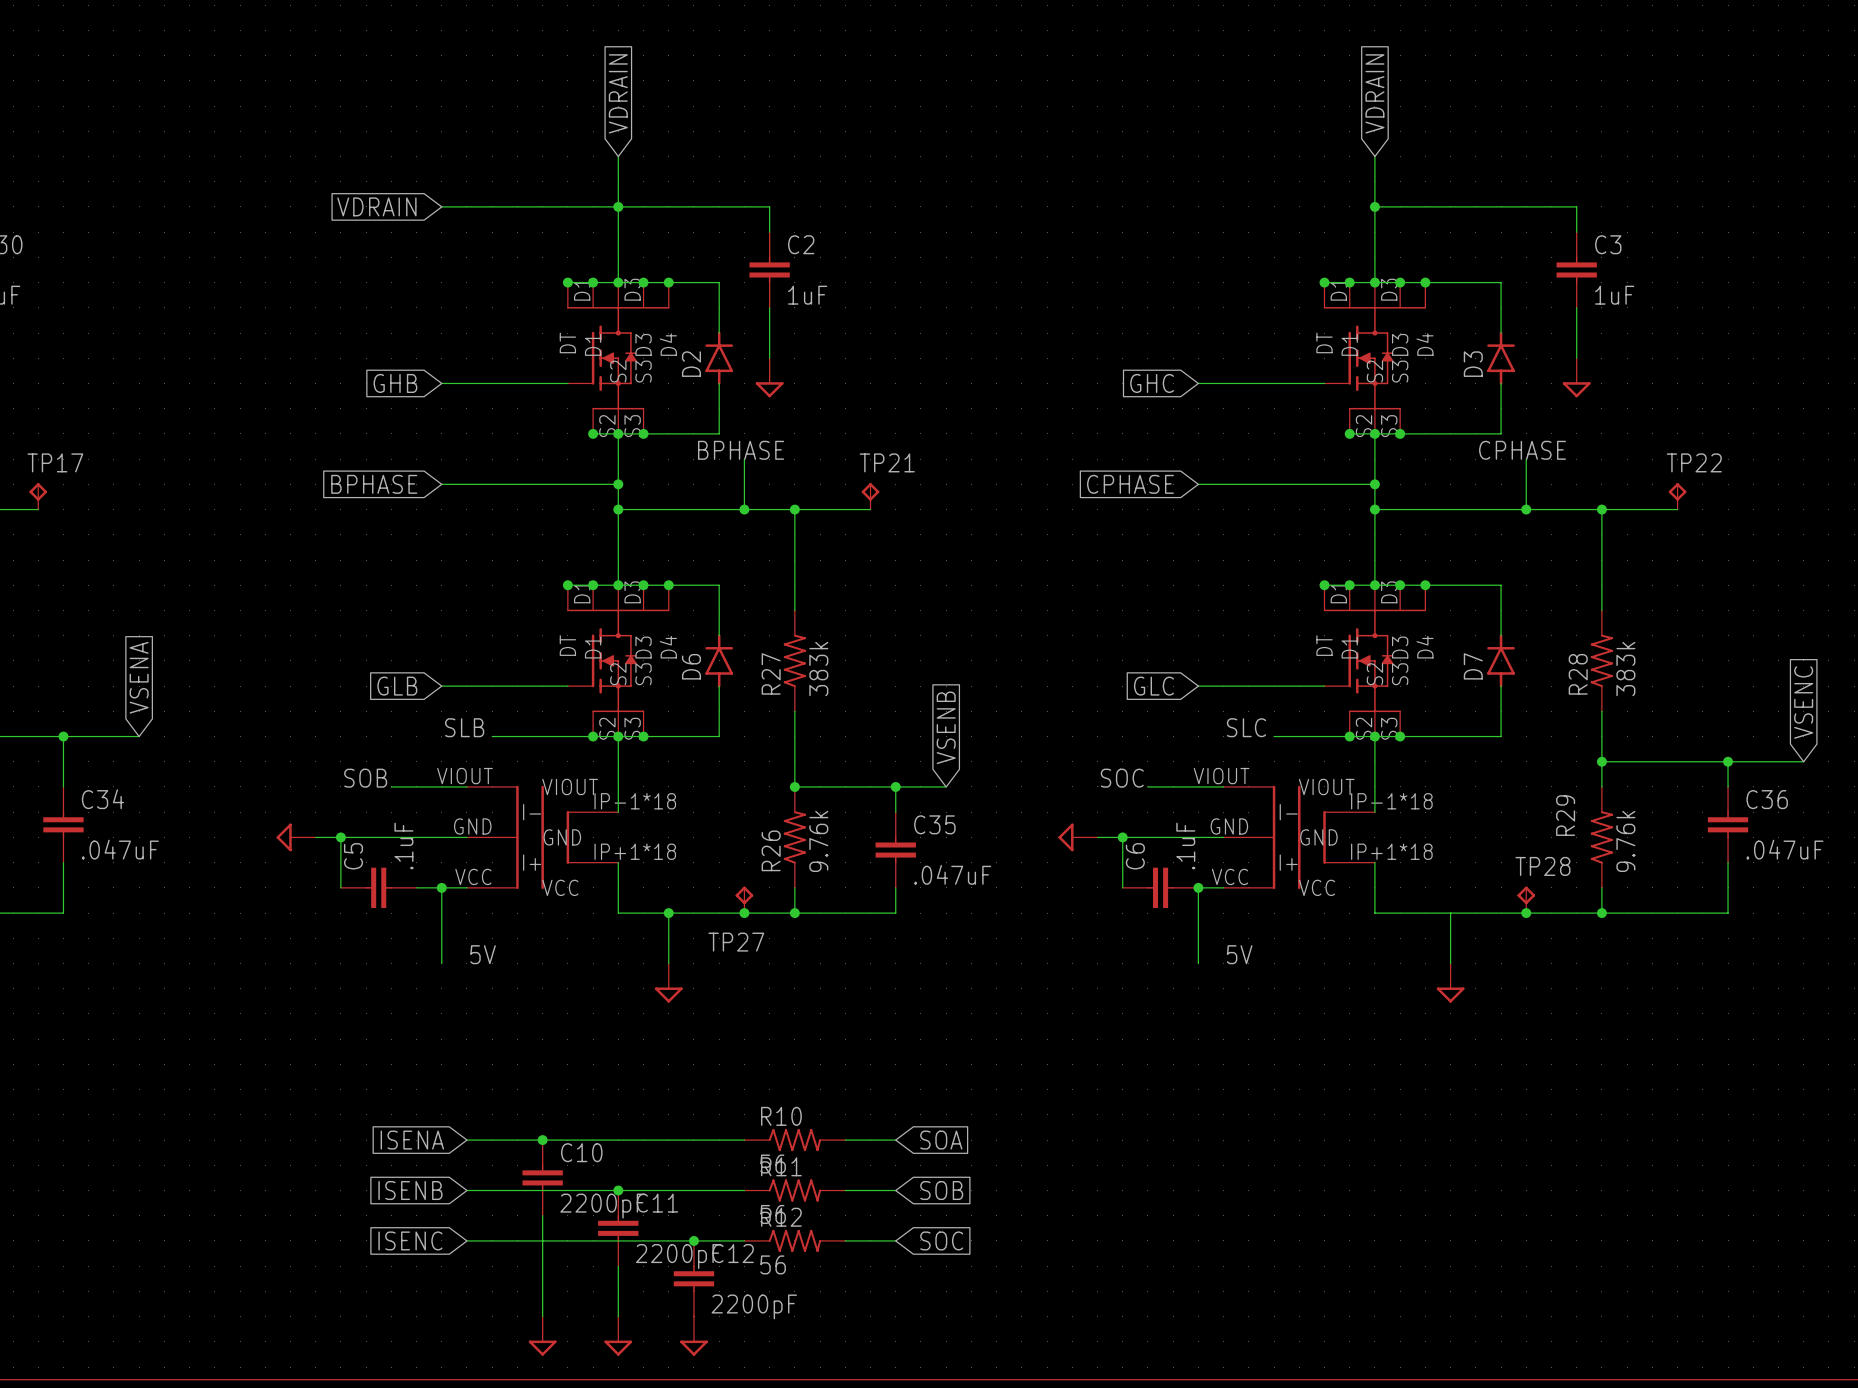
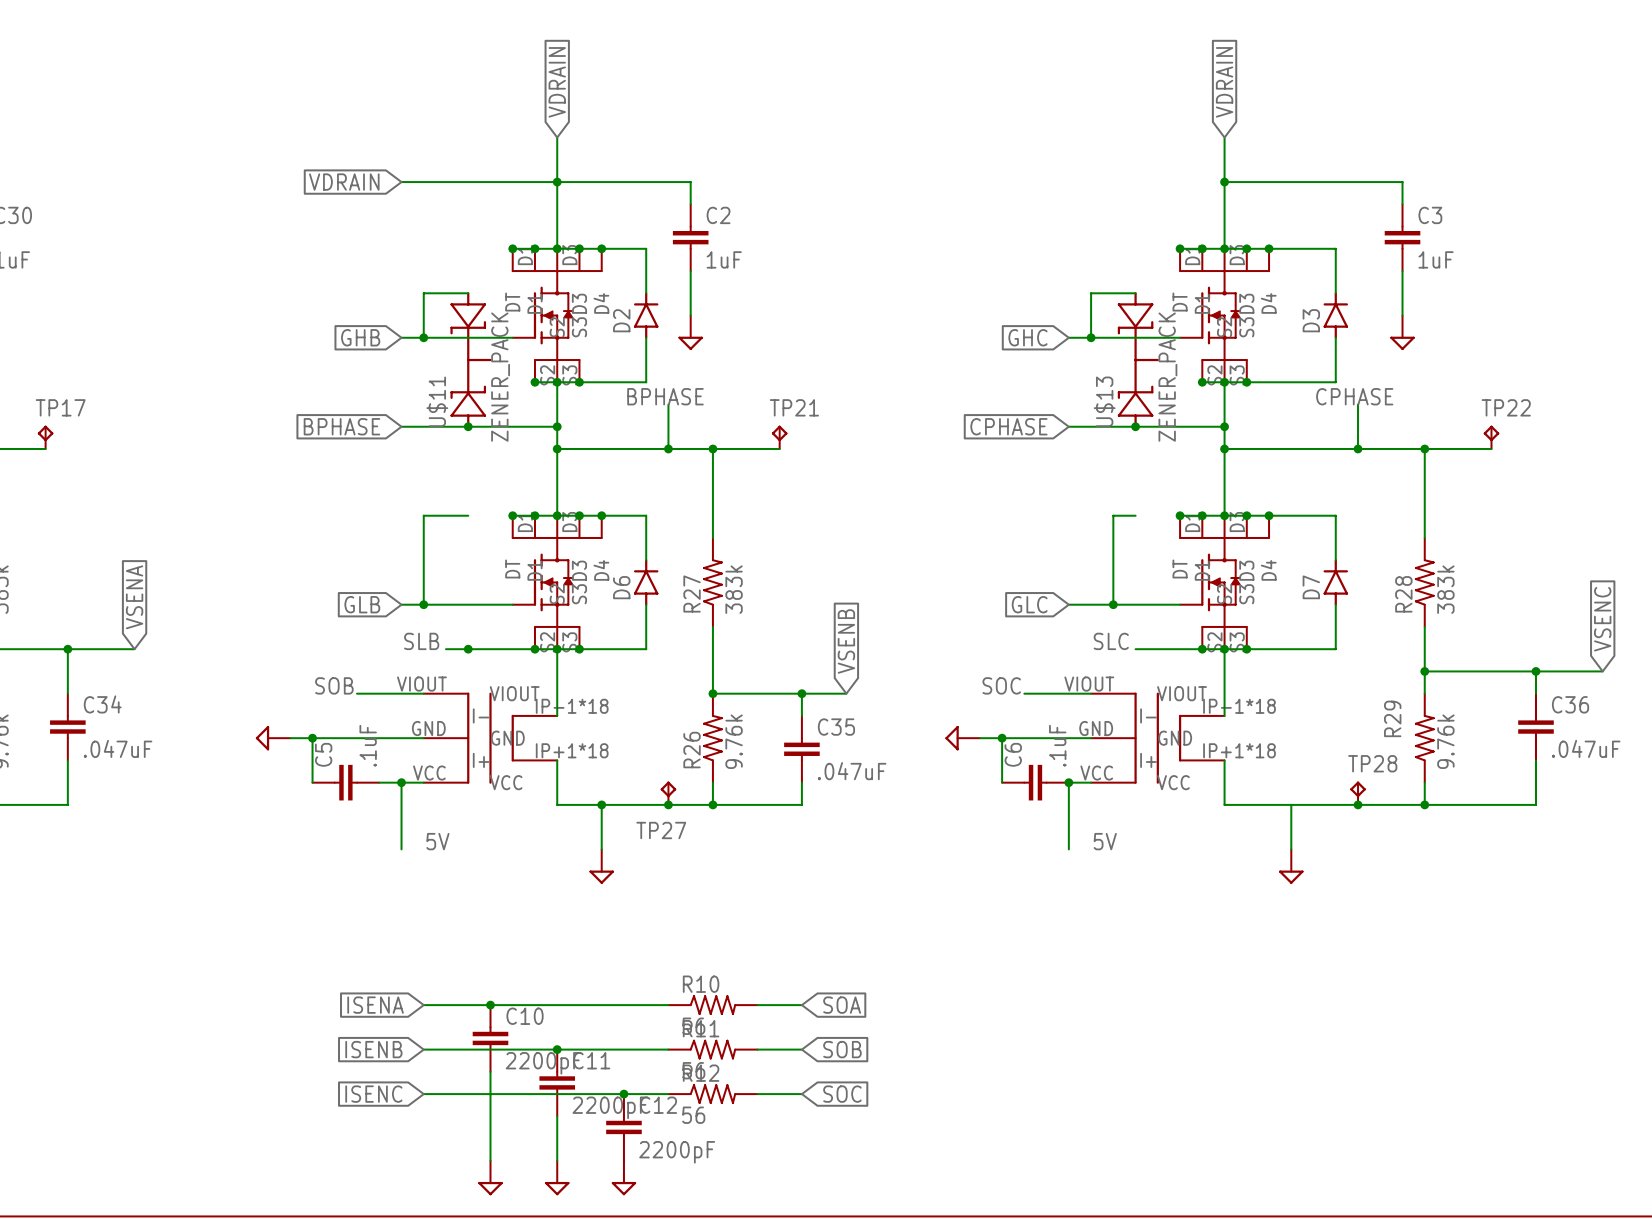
wire: none -> (468, 293) (423, 293) (423, 337)
wire: none -> (1135, 293) (1091, 293) (1091, 337)
junction: none -> (423, 337)
junction: none -> (1091, 337)
U$11: none -> ZENER_PACK (471, 360)
U$13: none -> ZENER_PACK (1138, 360)
junction: none -> (468, 426)
junction: none -> (1135, 426)
wire: none -> (468, 515) (423, 515) (423, 604)
wire: none -> (1135, 515) (1113, 515) (1113, 604)
junction: none -> (423, 604)
junction: none -> (1113, 604)
junction: none -> (468, 649)

